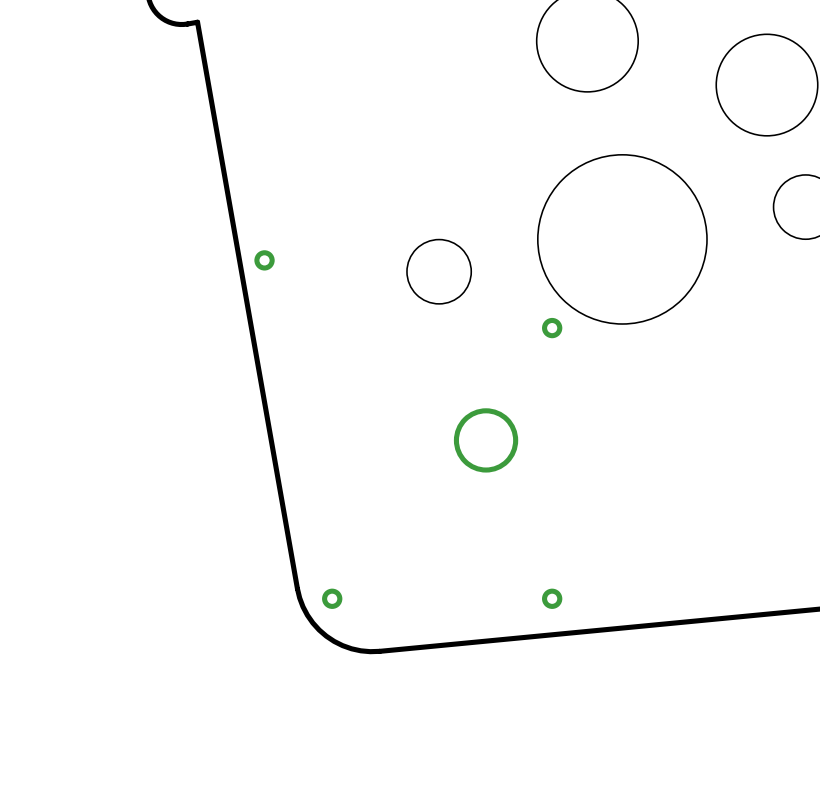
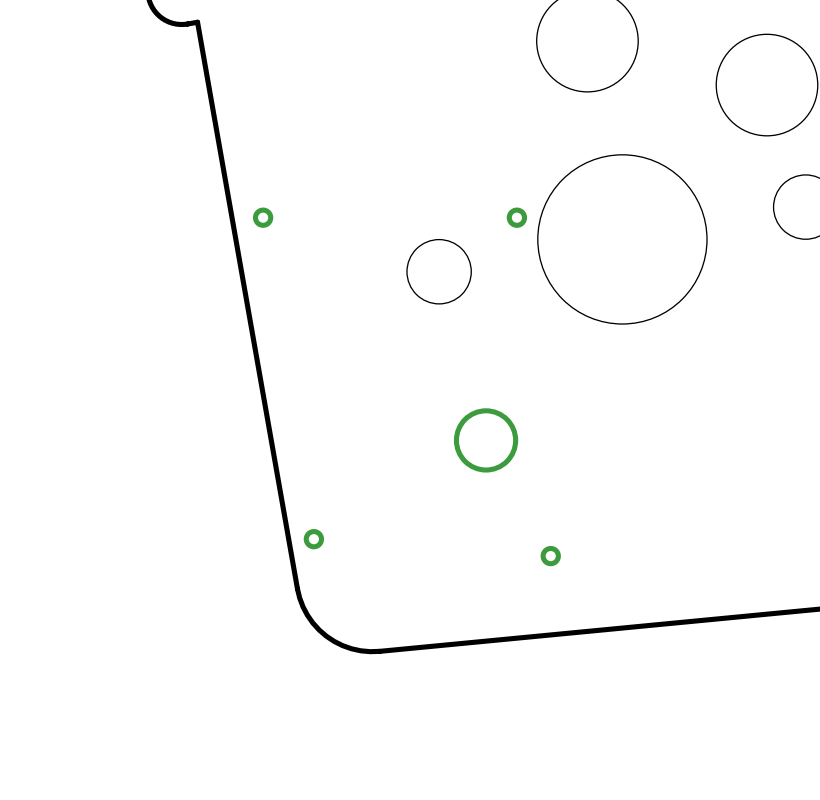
via: none -> (516, 217)
via position: (264, 260) -> (263, 217)
via: (552, 328) -> none
via position: (332, 598) -> (313, 539)
via position: (552, 598) -> (550, 556)

